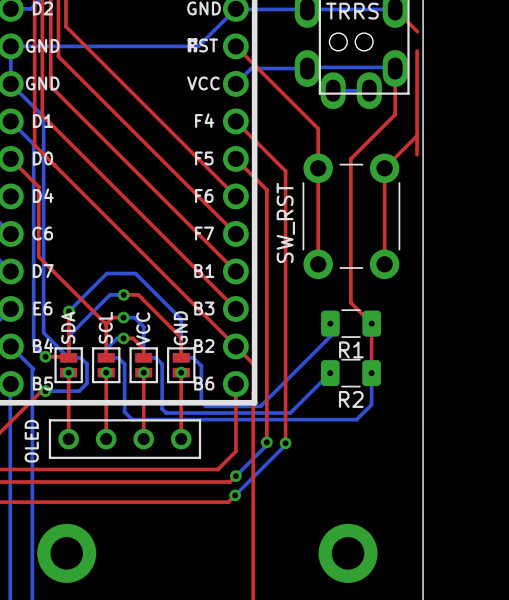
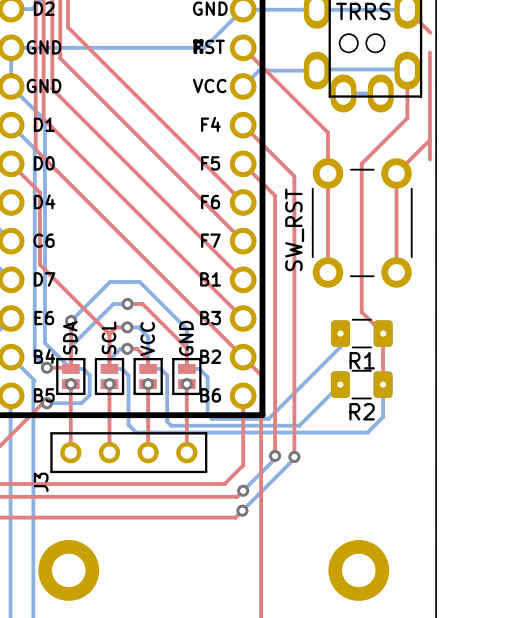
OLED name: OLED (31, 441) -> J3 (41, 482)

